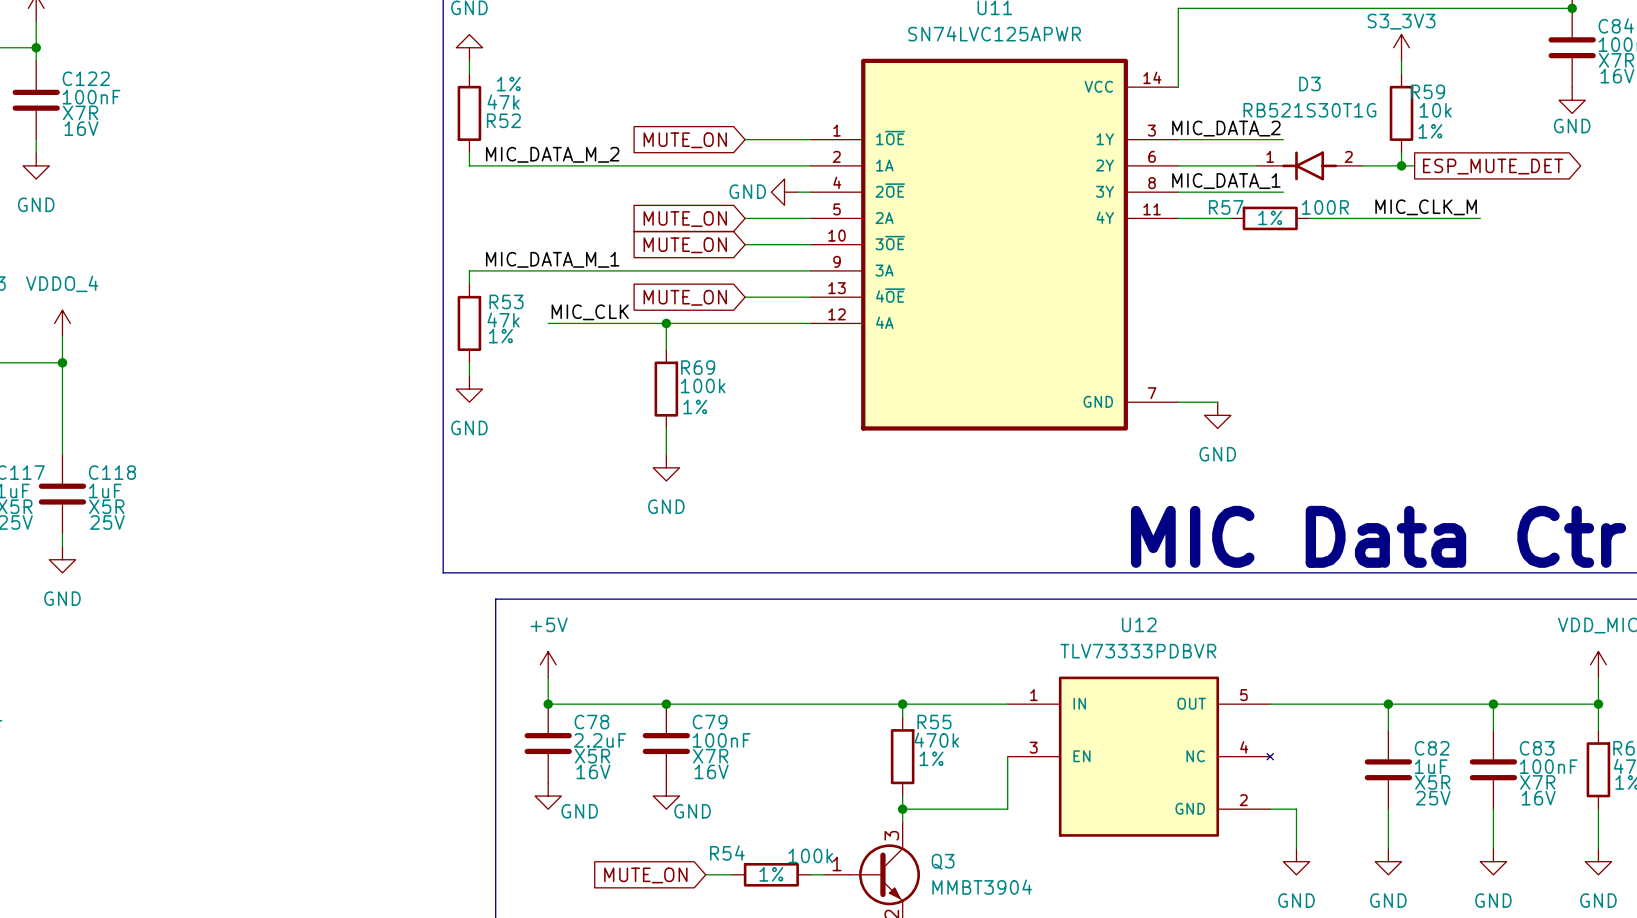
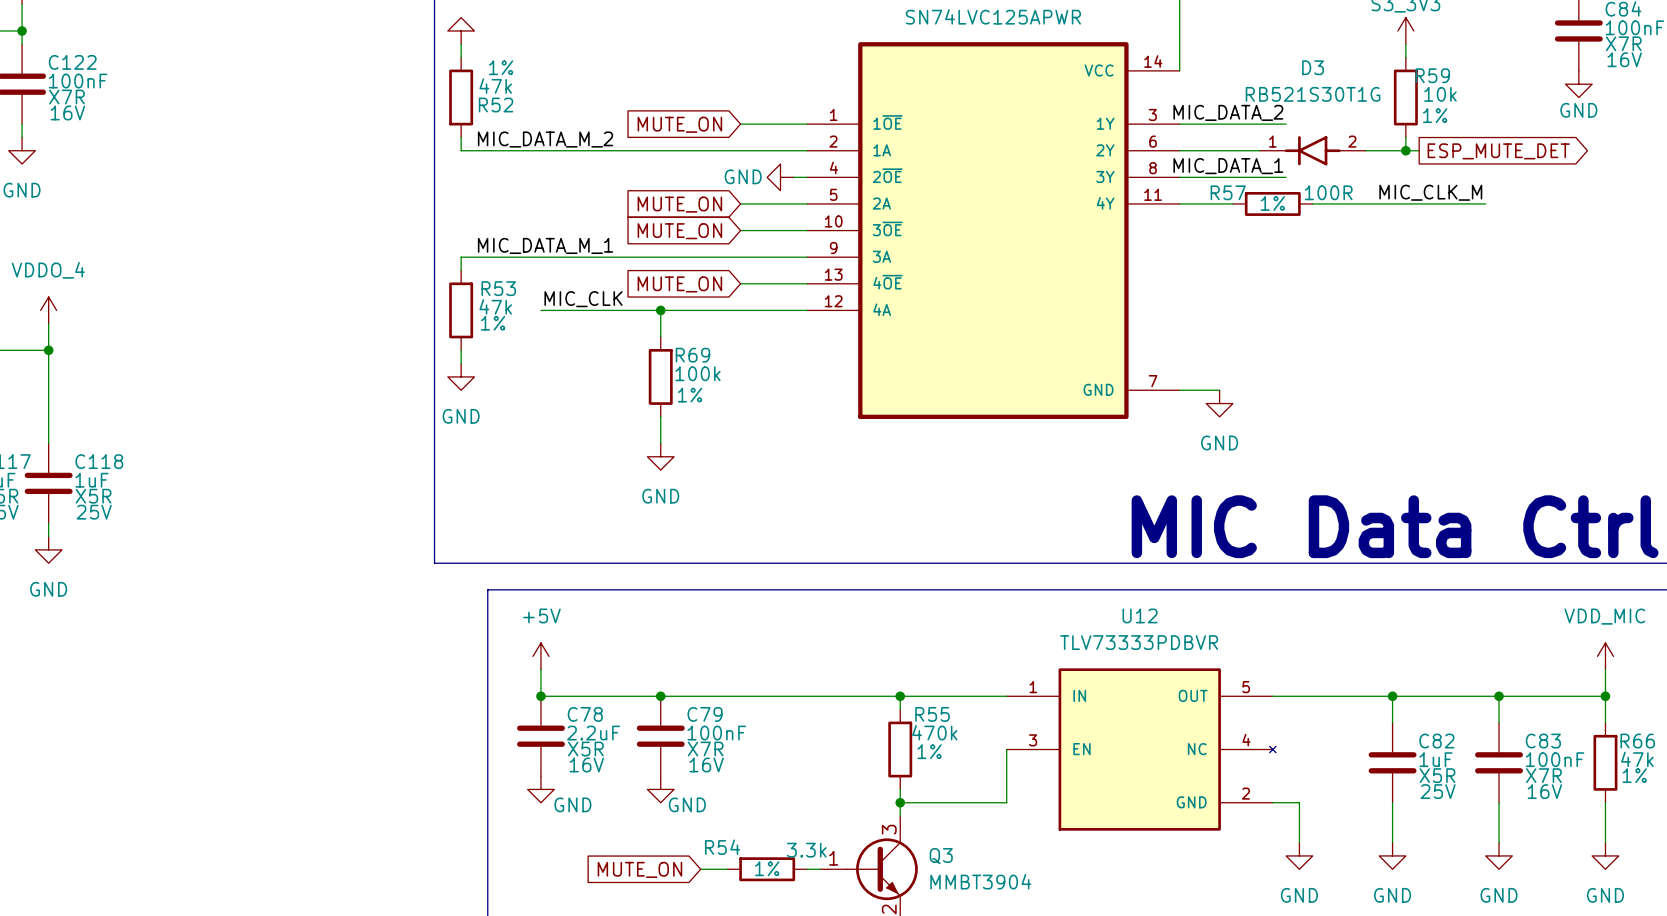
R54 value: 100k (810, 855) -> 3.3k (806, 850)

